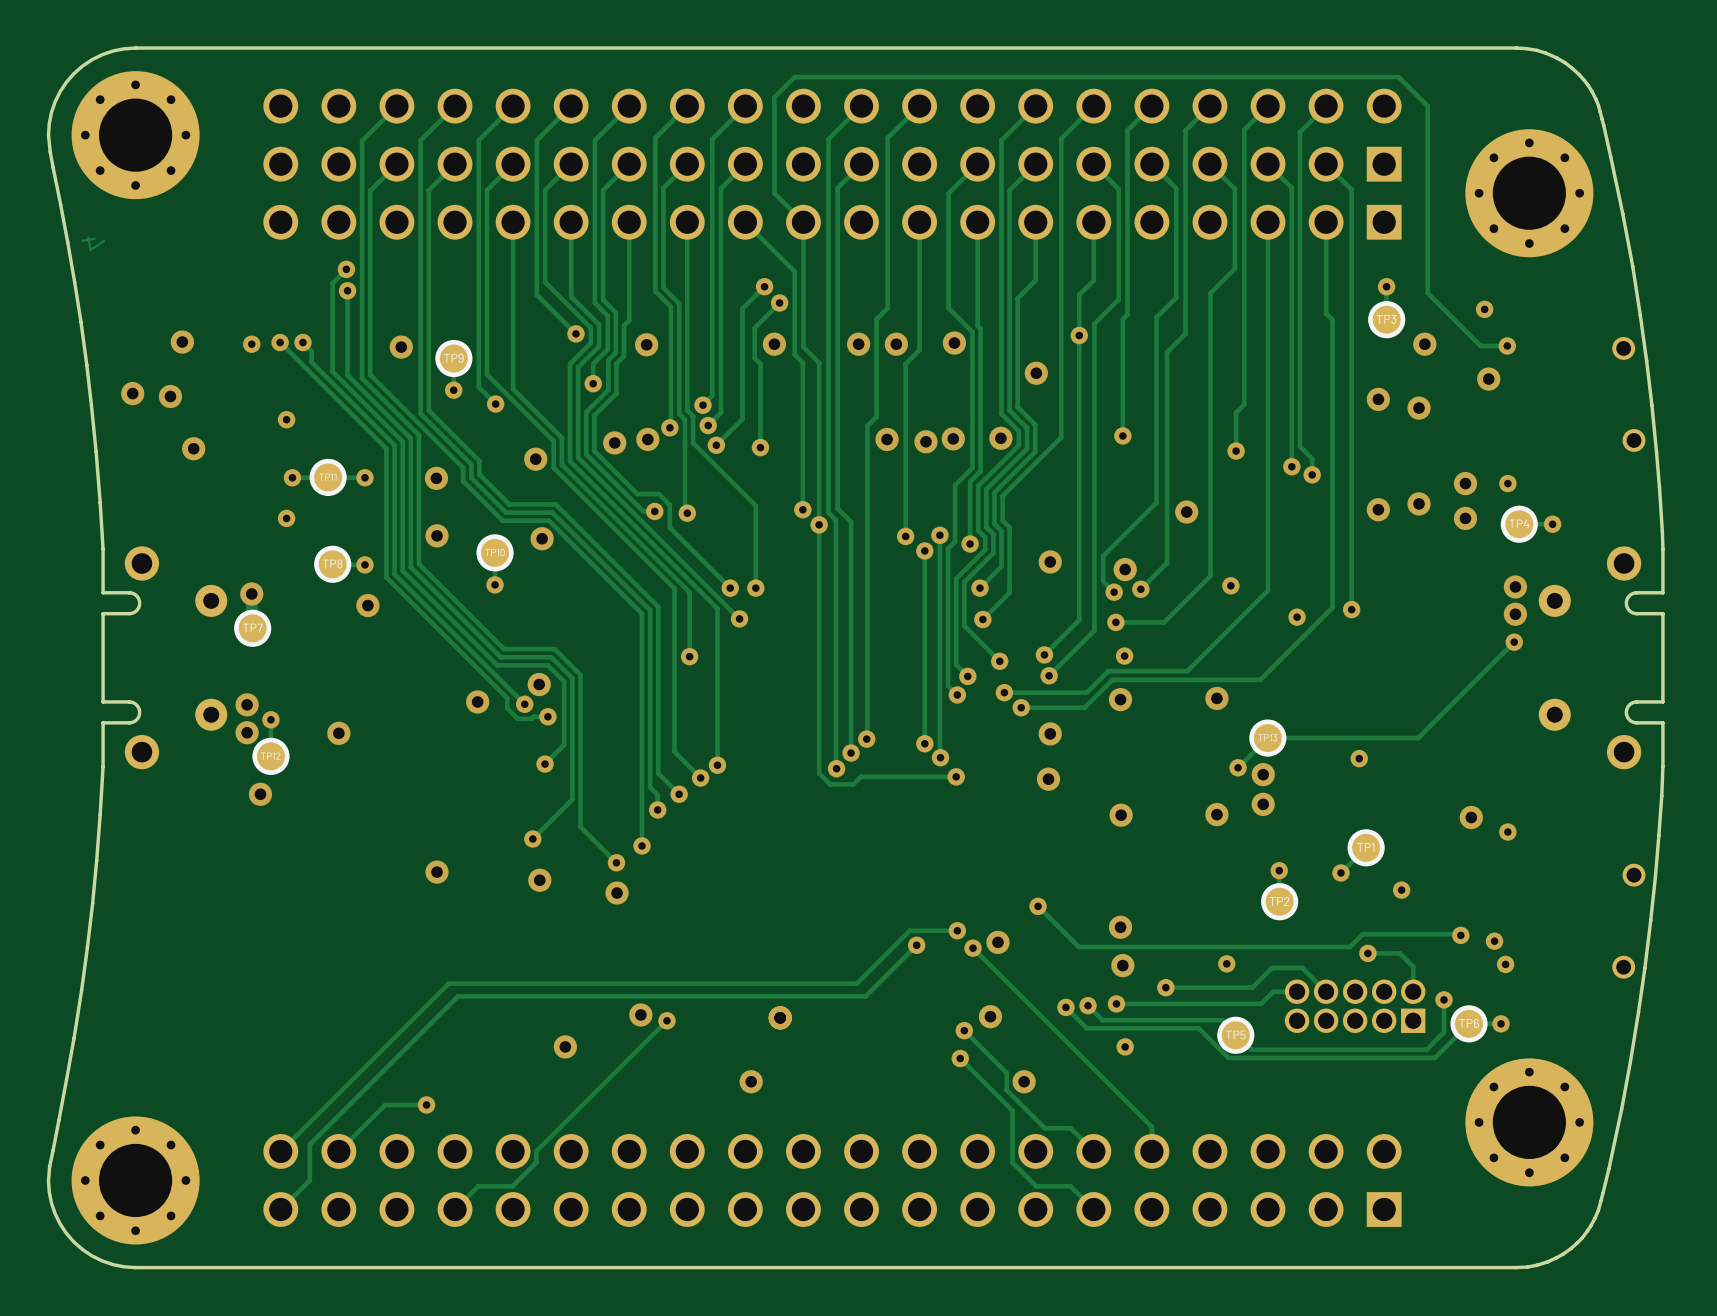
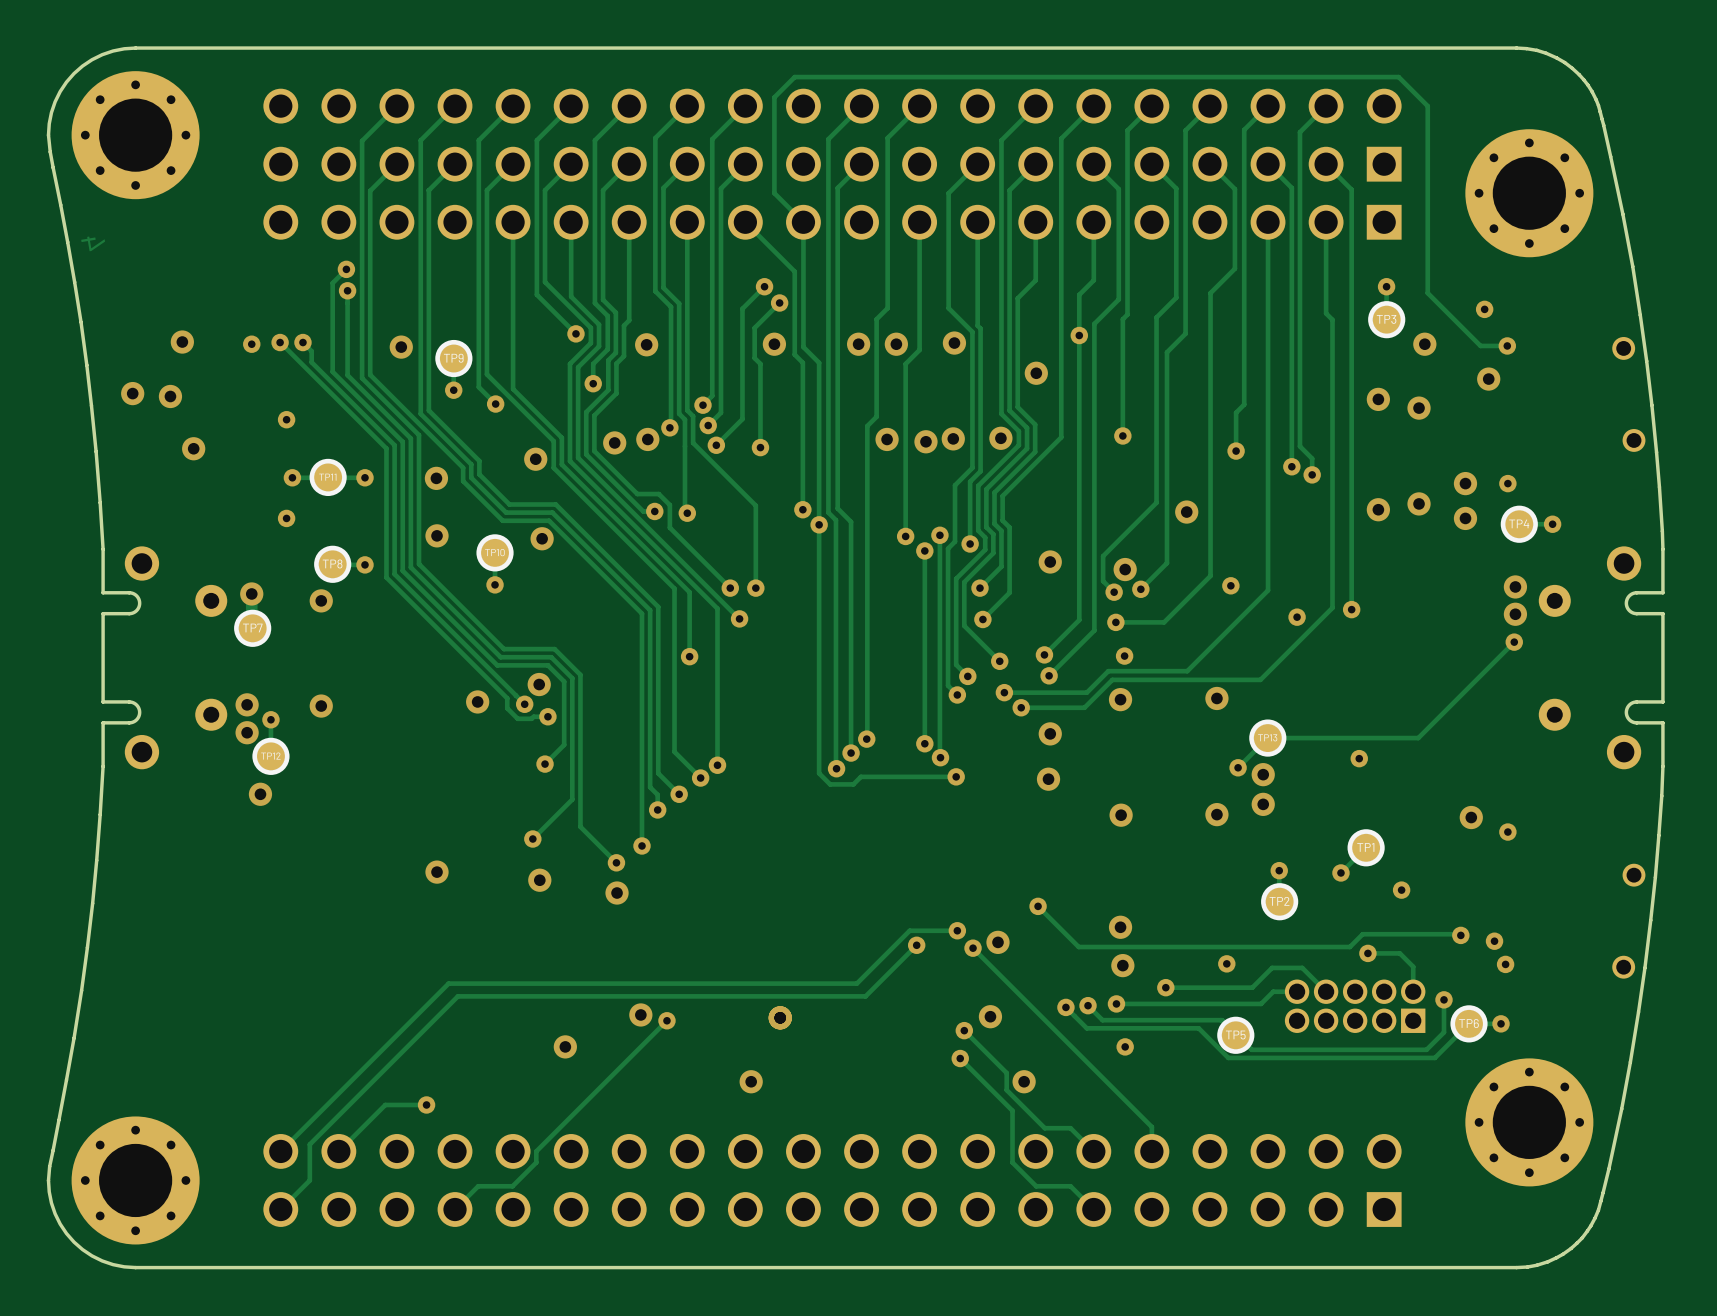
via position: (367, 605) -> (321, 600)
via position: (338, 733) -> (321, 706)

